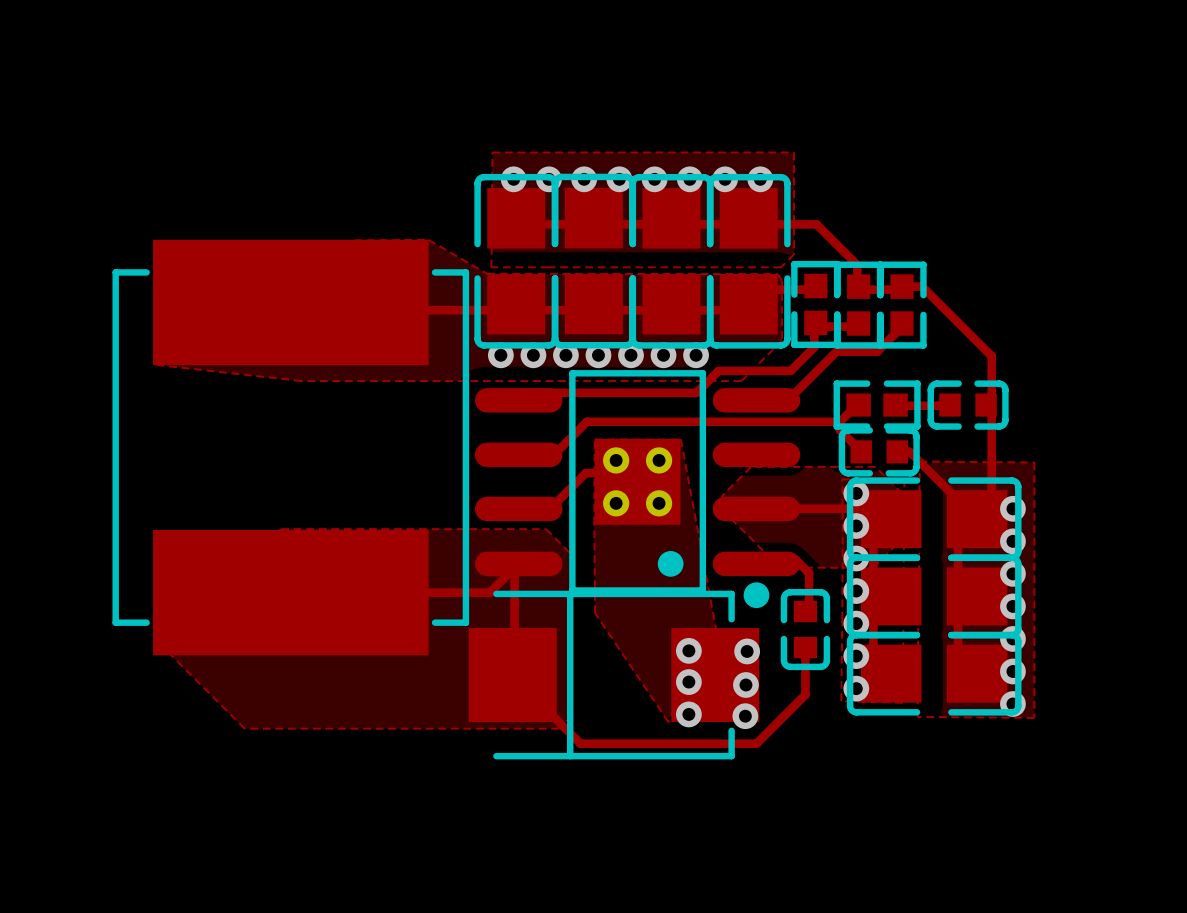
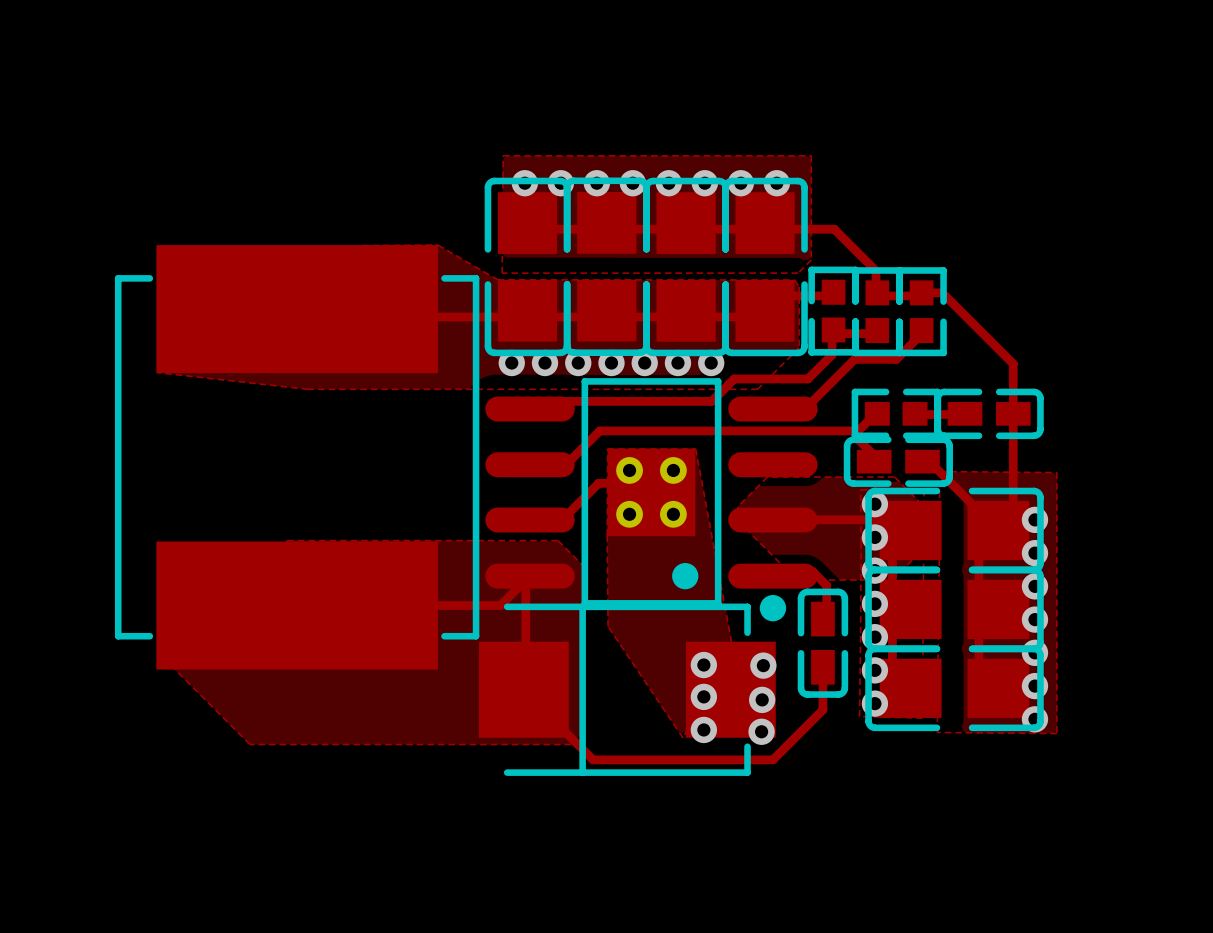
part footprint: [927, 380, 1009, 430] -> [934, 388, 1044, 440]
part footprint: [838, 427, 920, 477] -> [843, 436, 953, 487]
part footprint: [780, 588, 831, 671] -> [797, 588, 849, 698]

